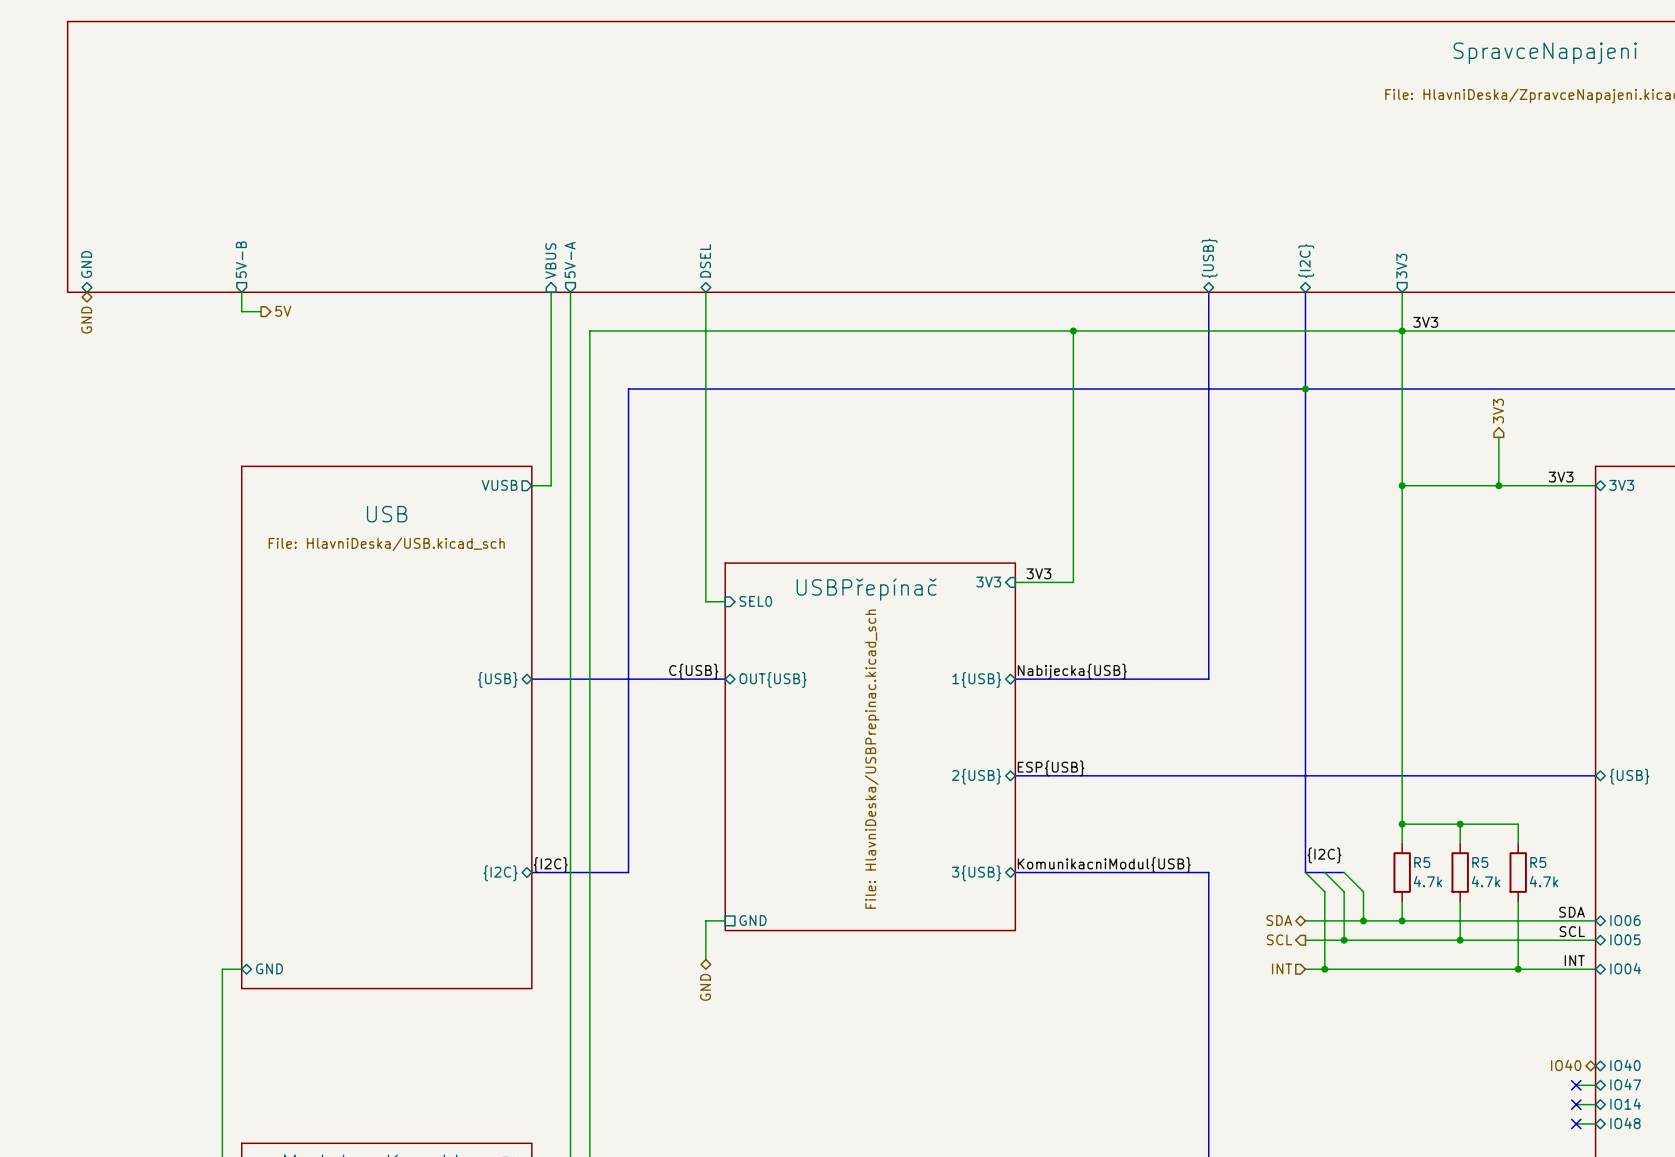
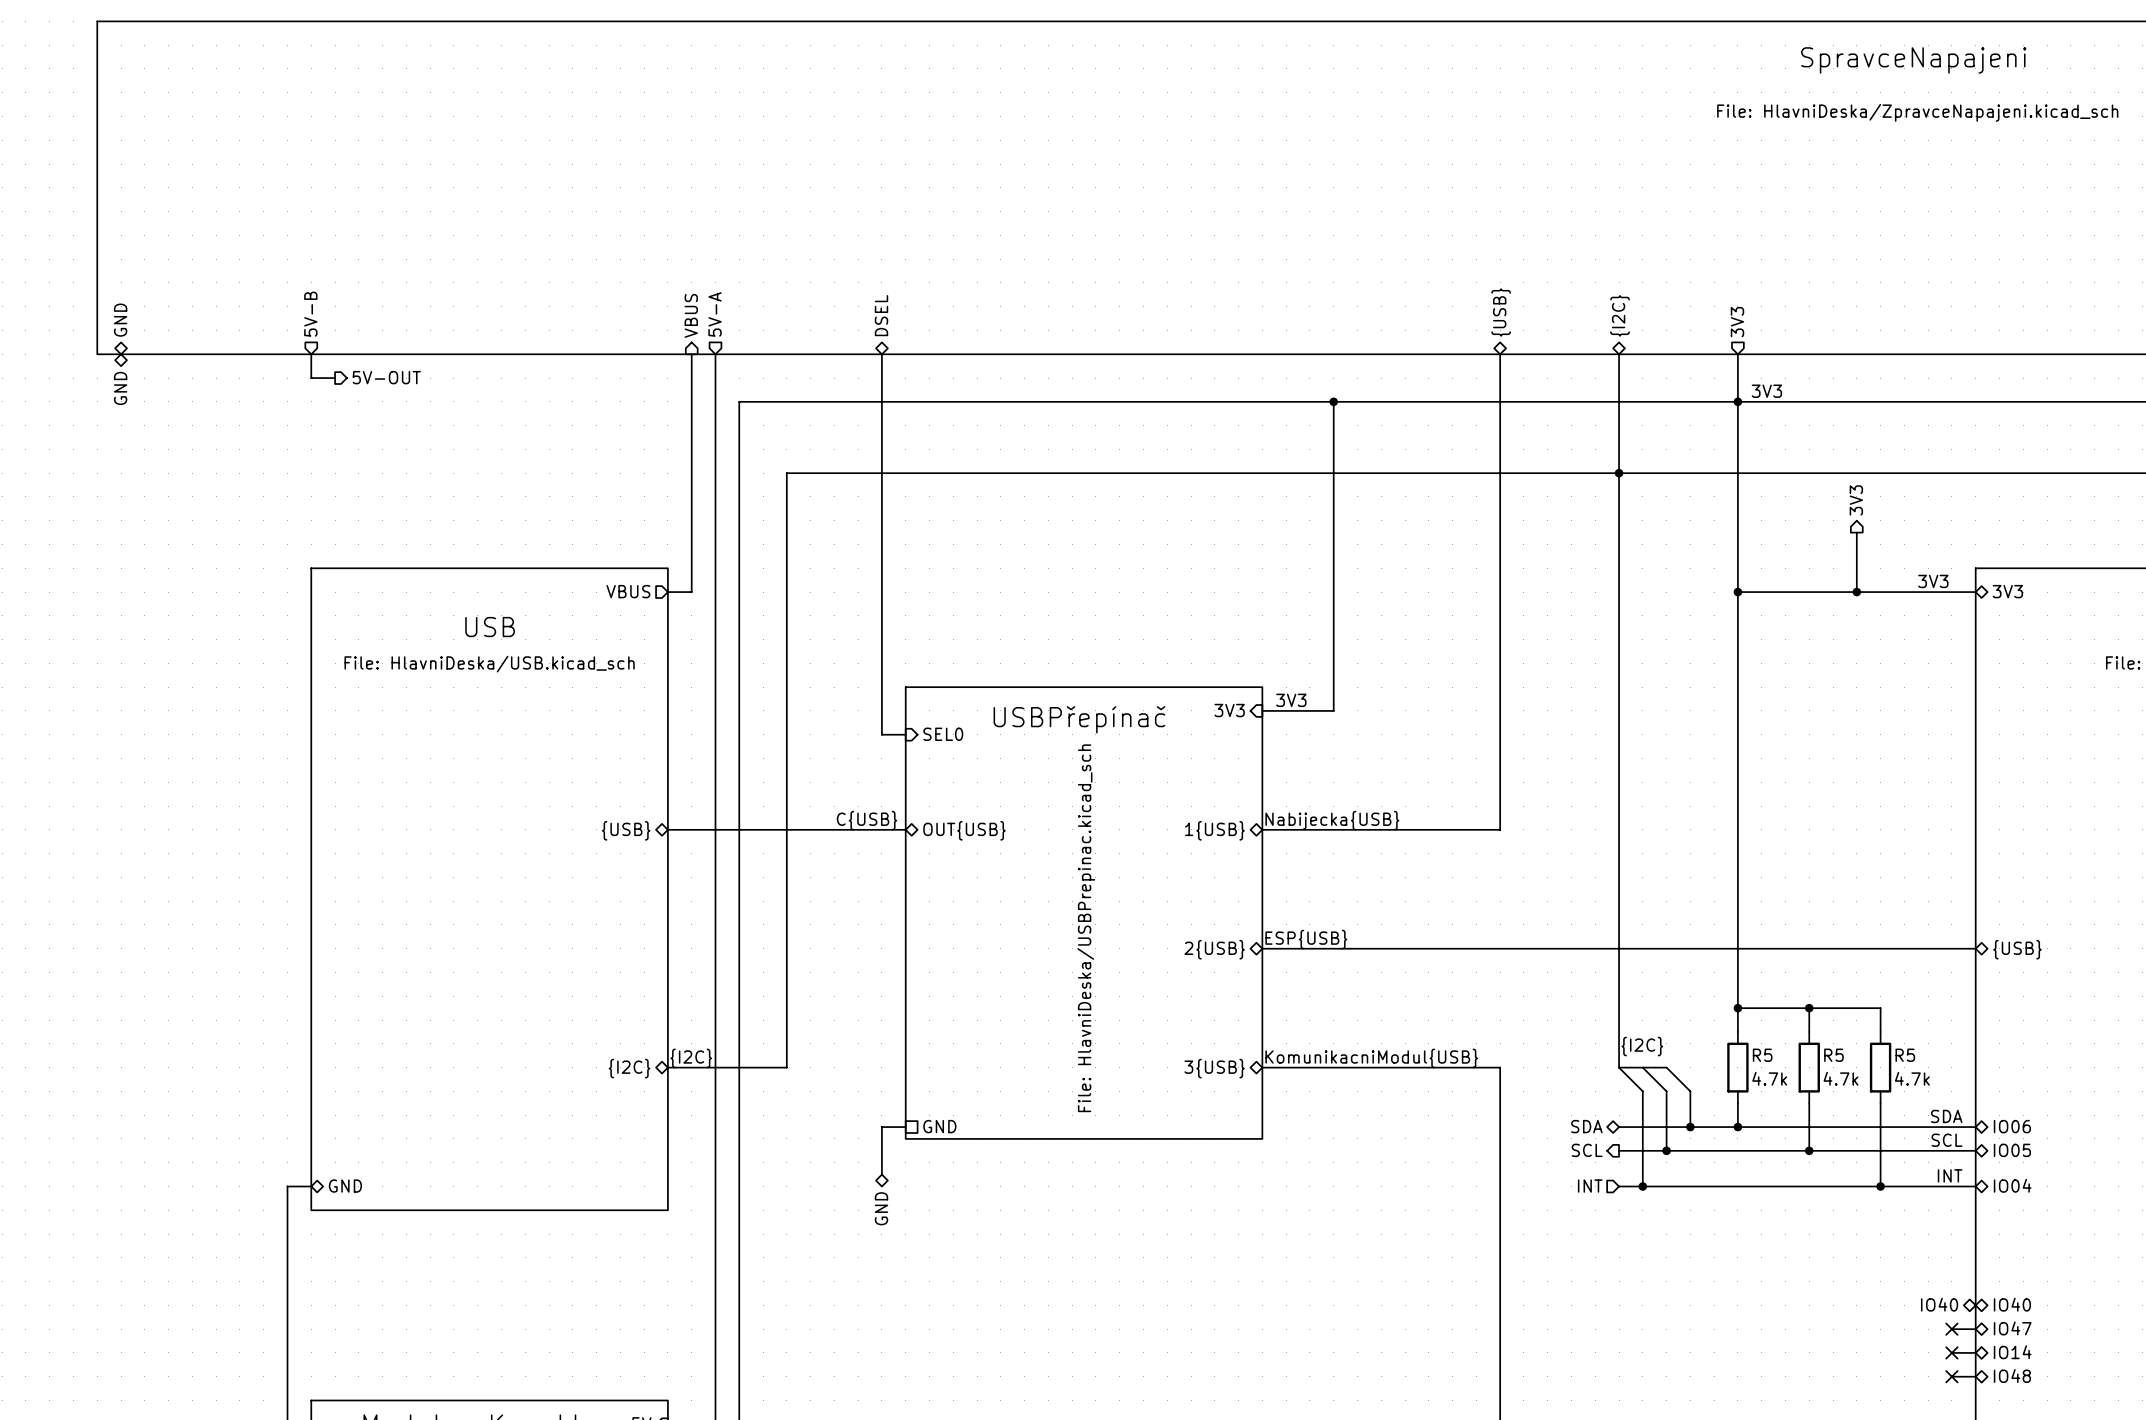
hierarchical label: 5V (283, 311) -> 5V-OUT (386, 377)
sheet pin: VUSB (499, 485) -> VBUS (628, 591)

